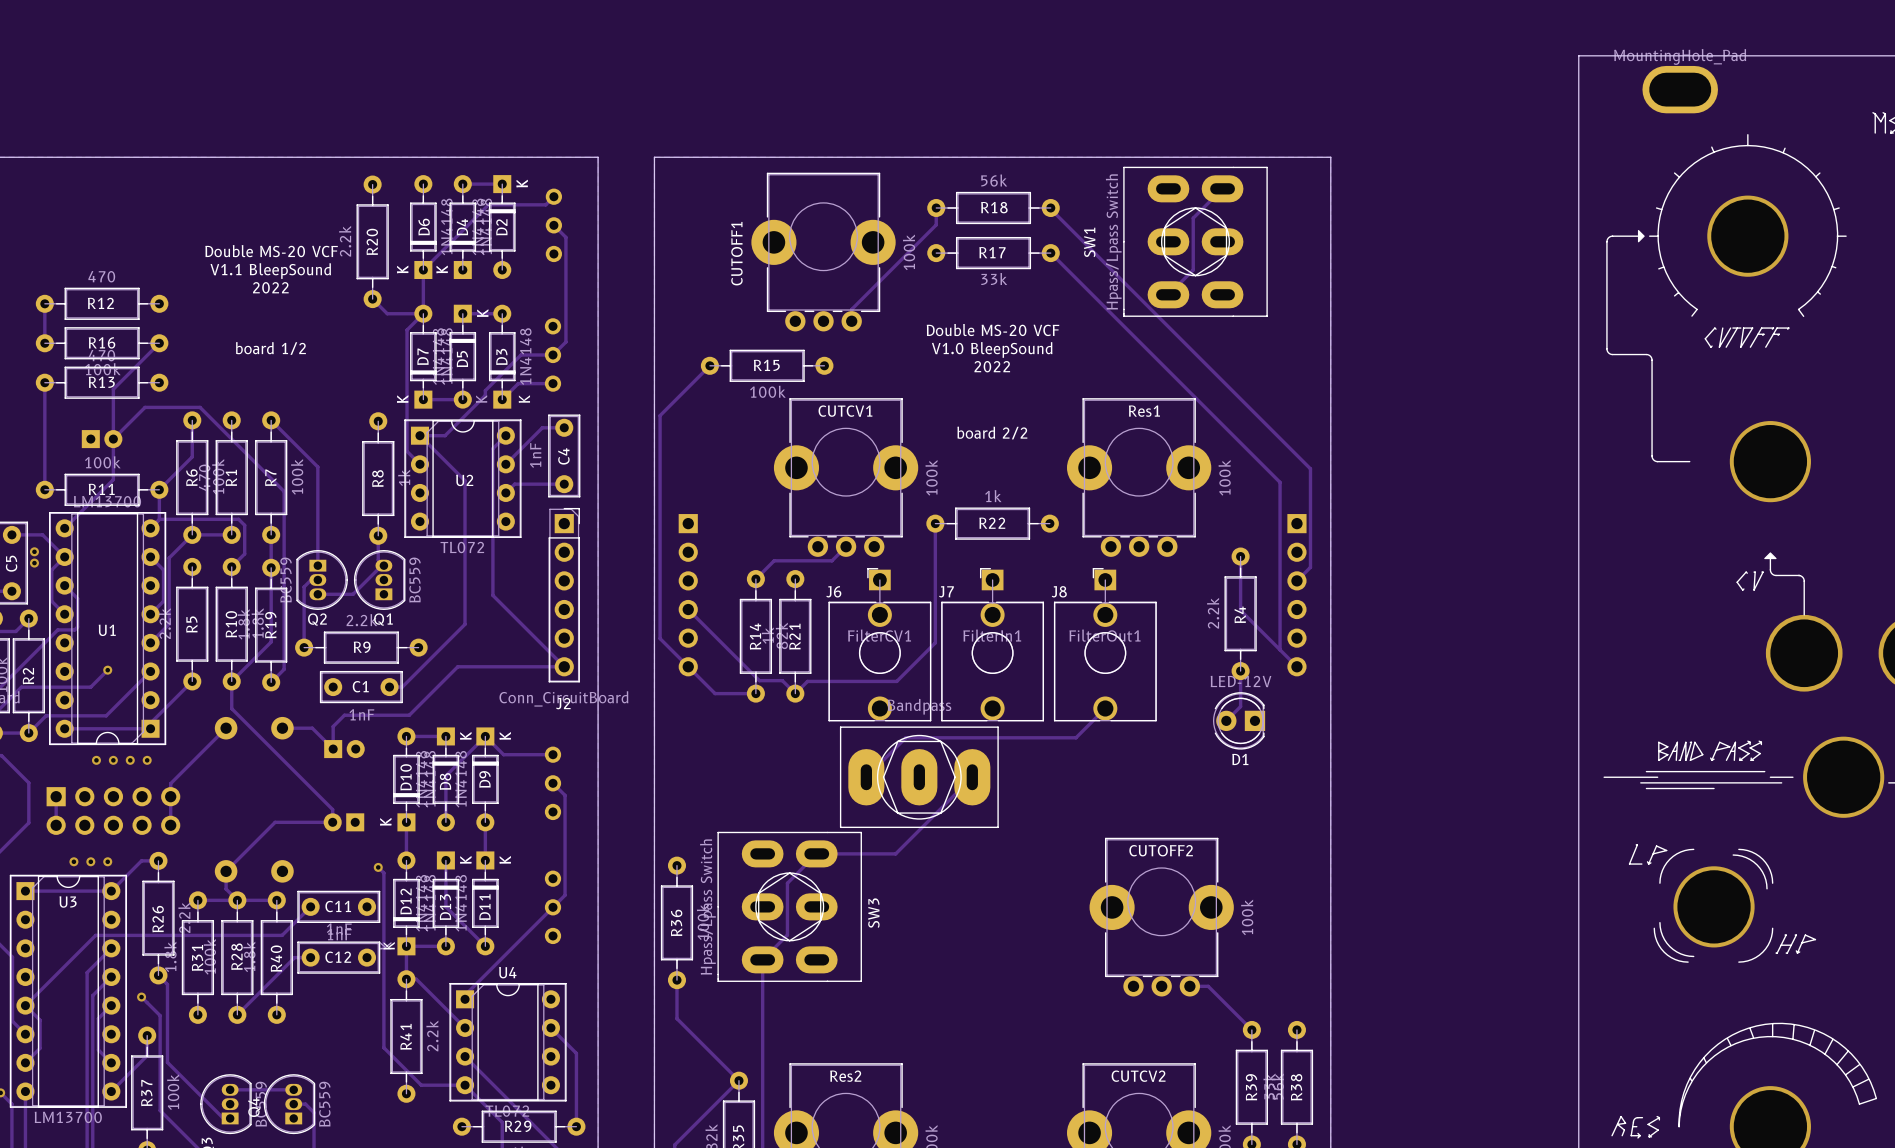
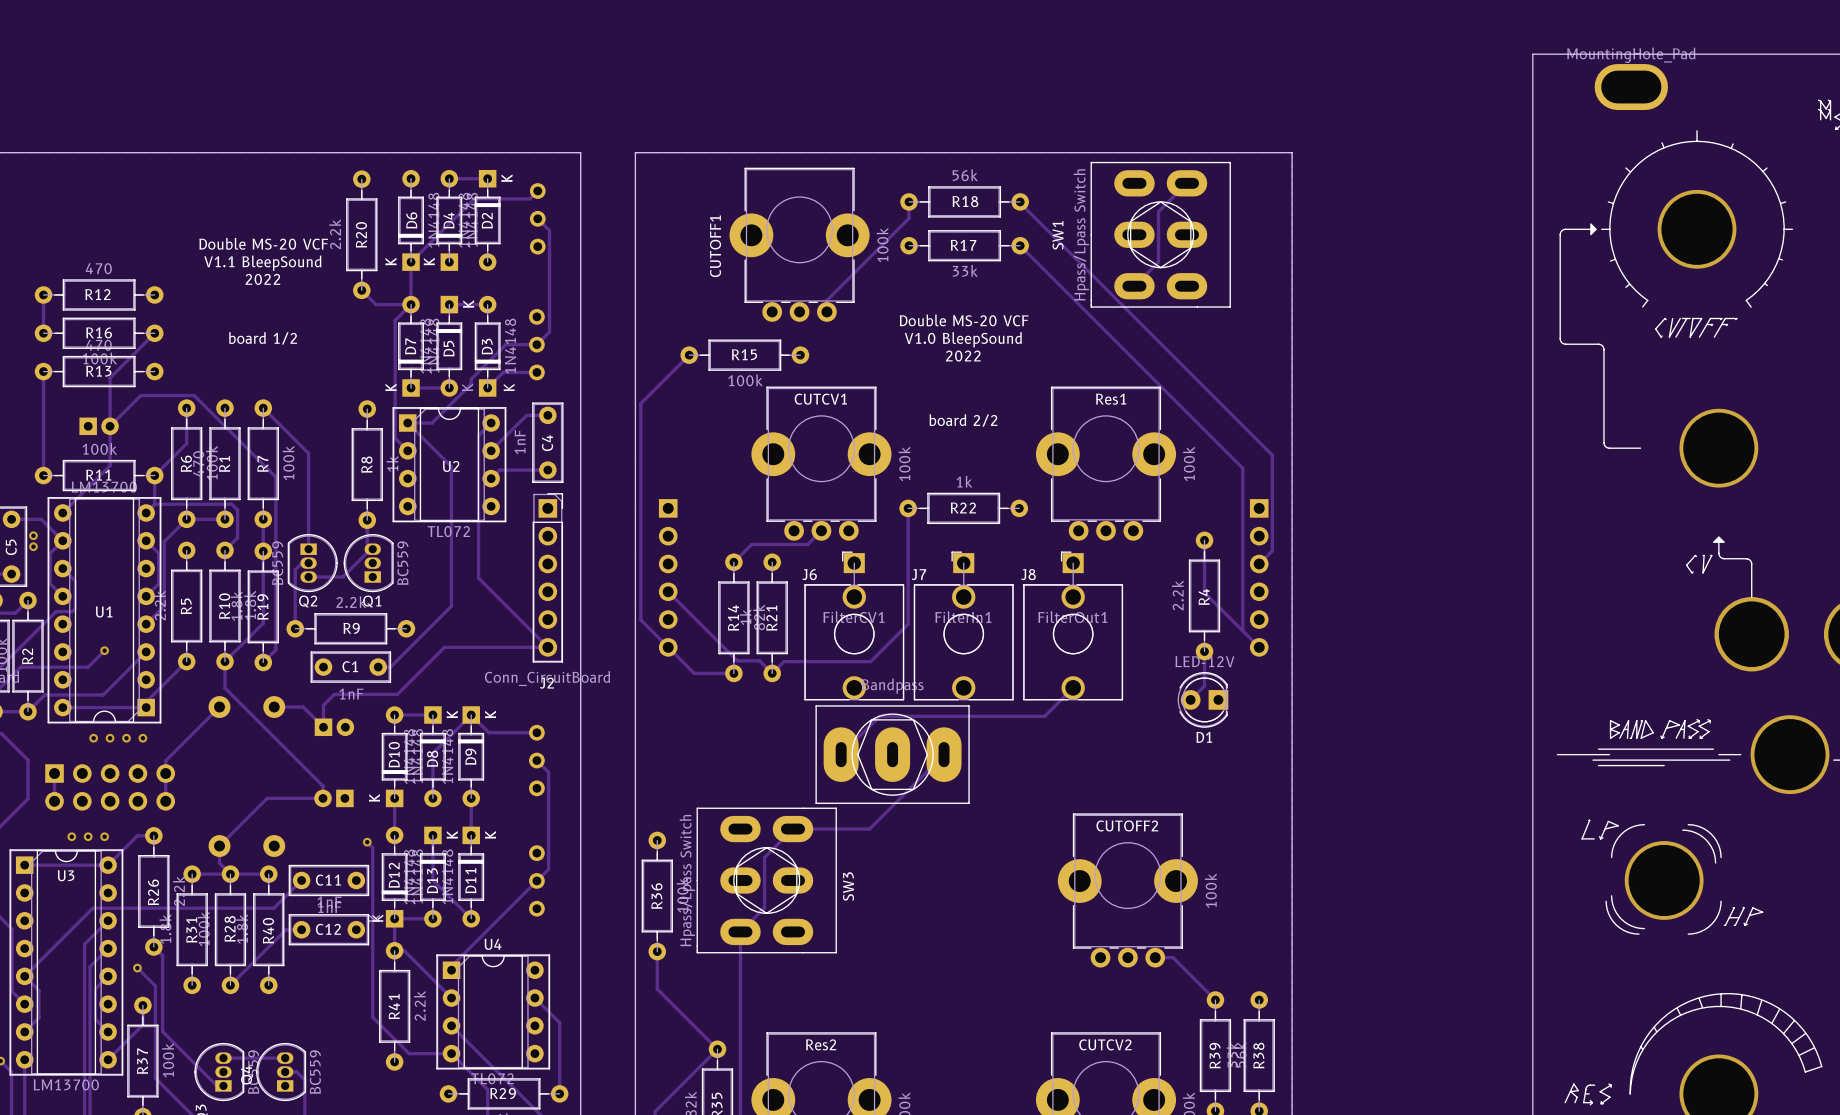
line: none -> (1818, 100) (1820, 101)
line: none -> (1828, 100) (1830, 101)
line: none -> (1820, 101) (1826, 108) (1830, 101)
line: (1875, 123) (1875, 133) -> (1820, 101) (1820, 110)
line: (1885, 123) (1885, 133) -> (1830, 101) (1830, 110)

